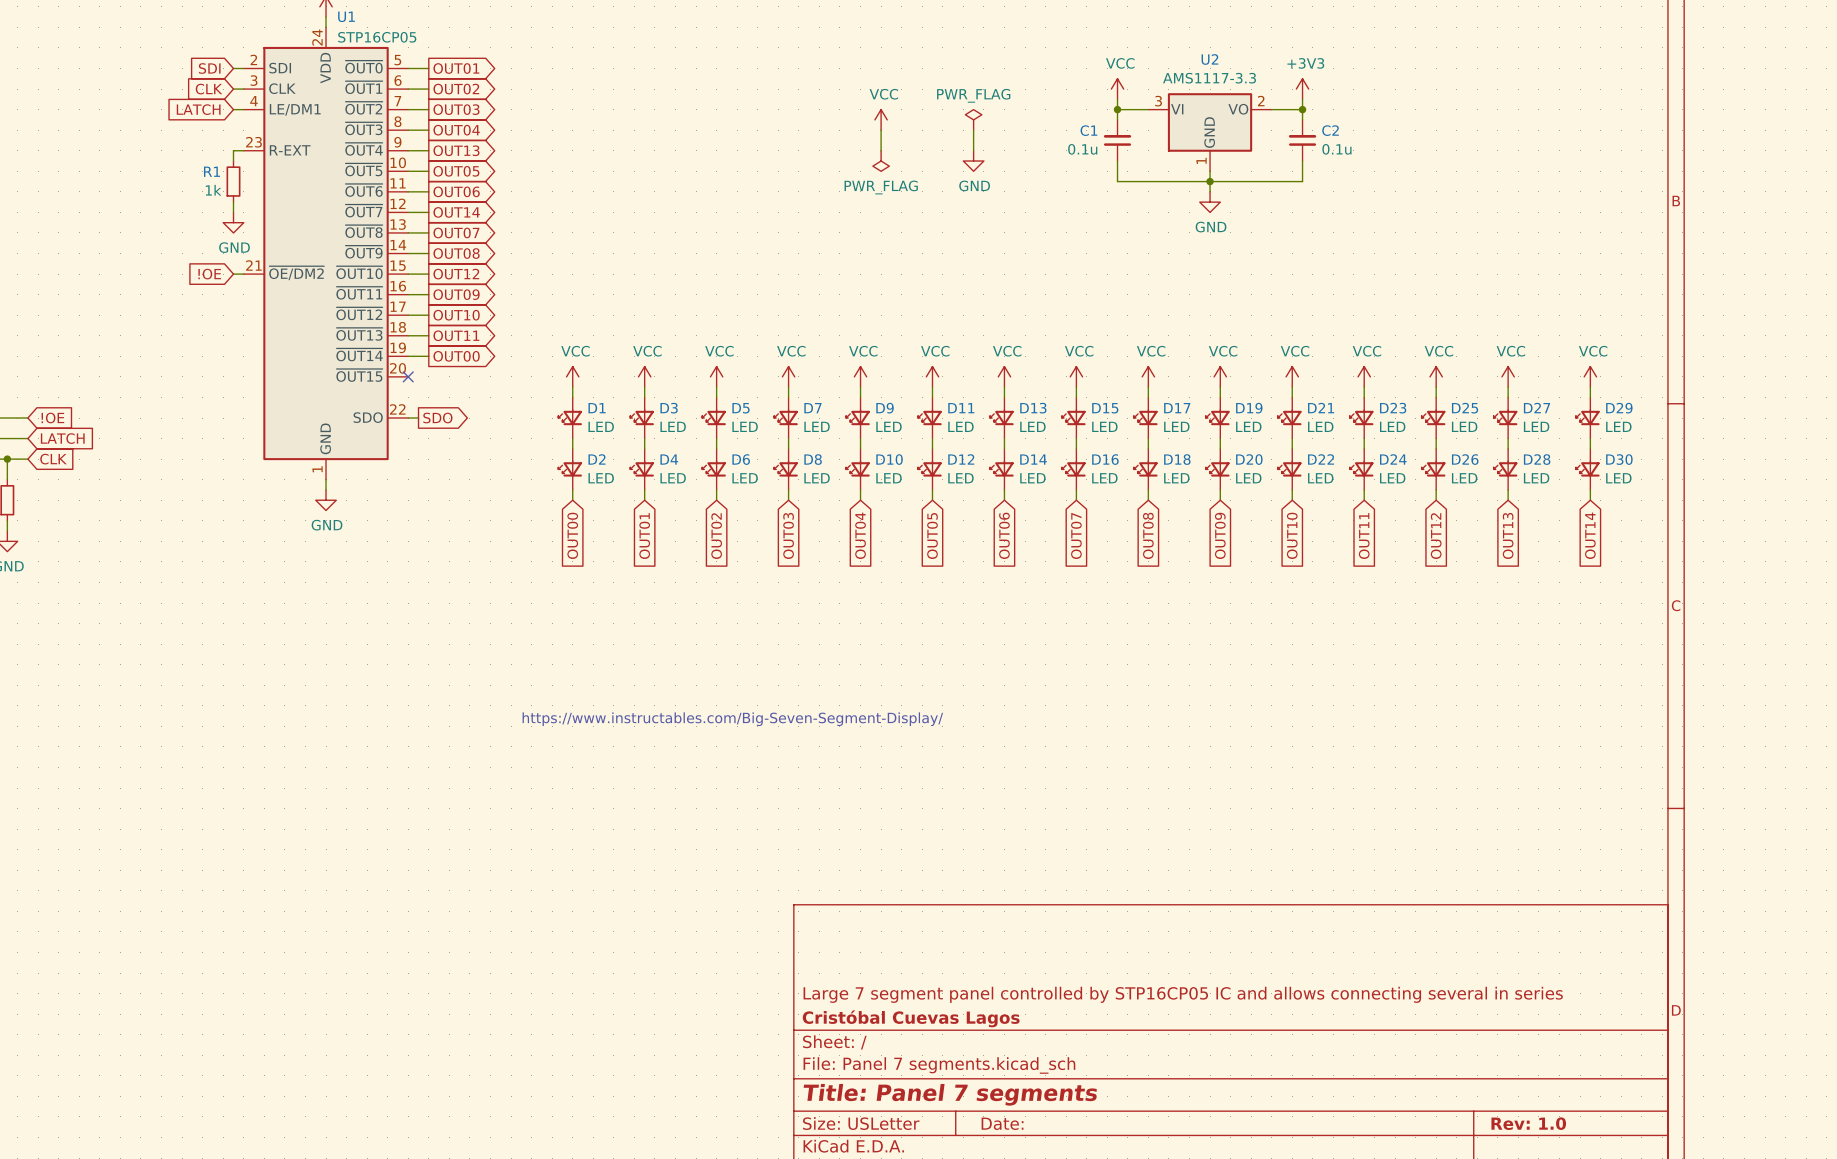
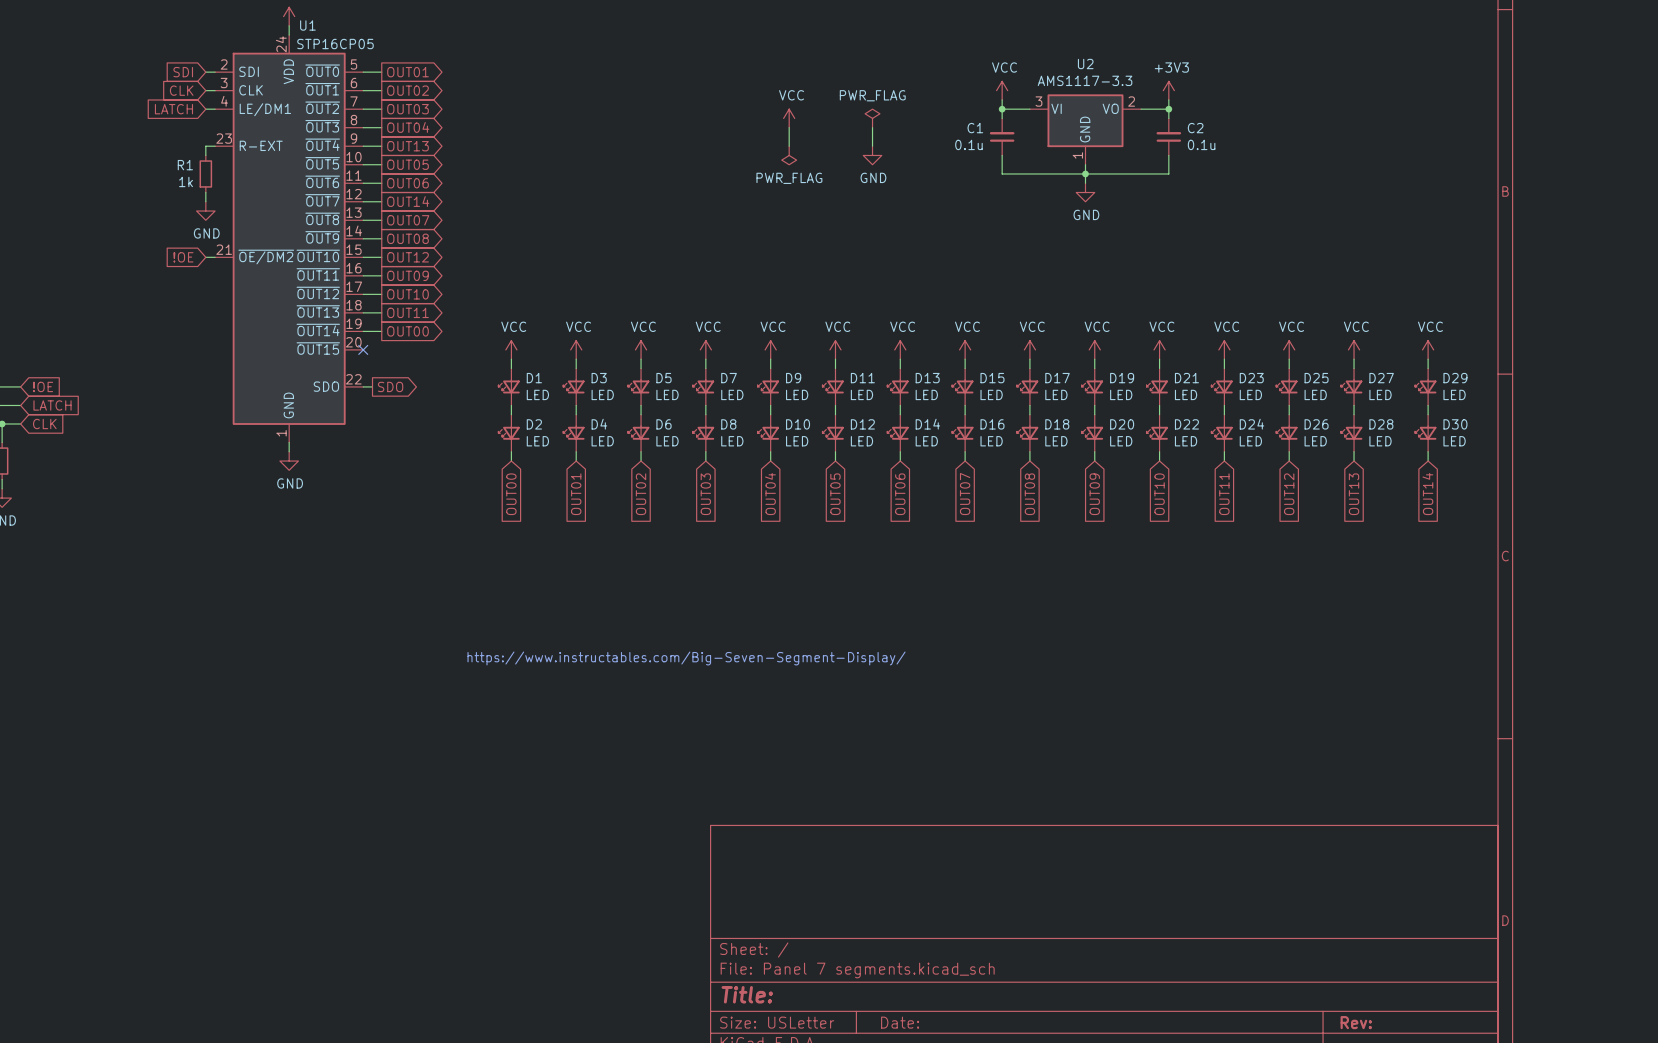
title block: Large 7 segment panel controlled by STP16CP05 IC and allows connecting several in series (1183, 994) -> none
title block: Cristóbal Cuevas Lagos (911, 1018) -> none
title block: Title: Panel 7 segments (950, 1094) -> Title: (747, 994)
title block: Rev: 1.0 (1528, 1123) -> Rev: (1356, 1022)

